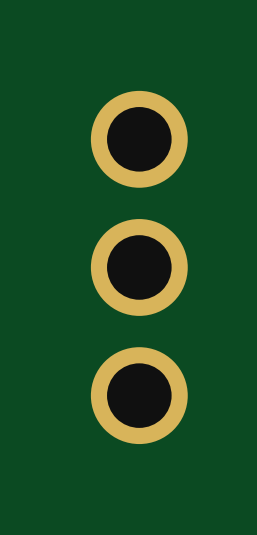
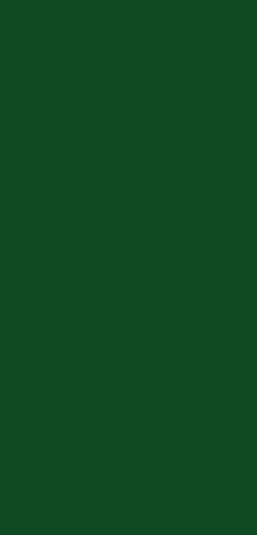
part: (139, 267) -> none

